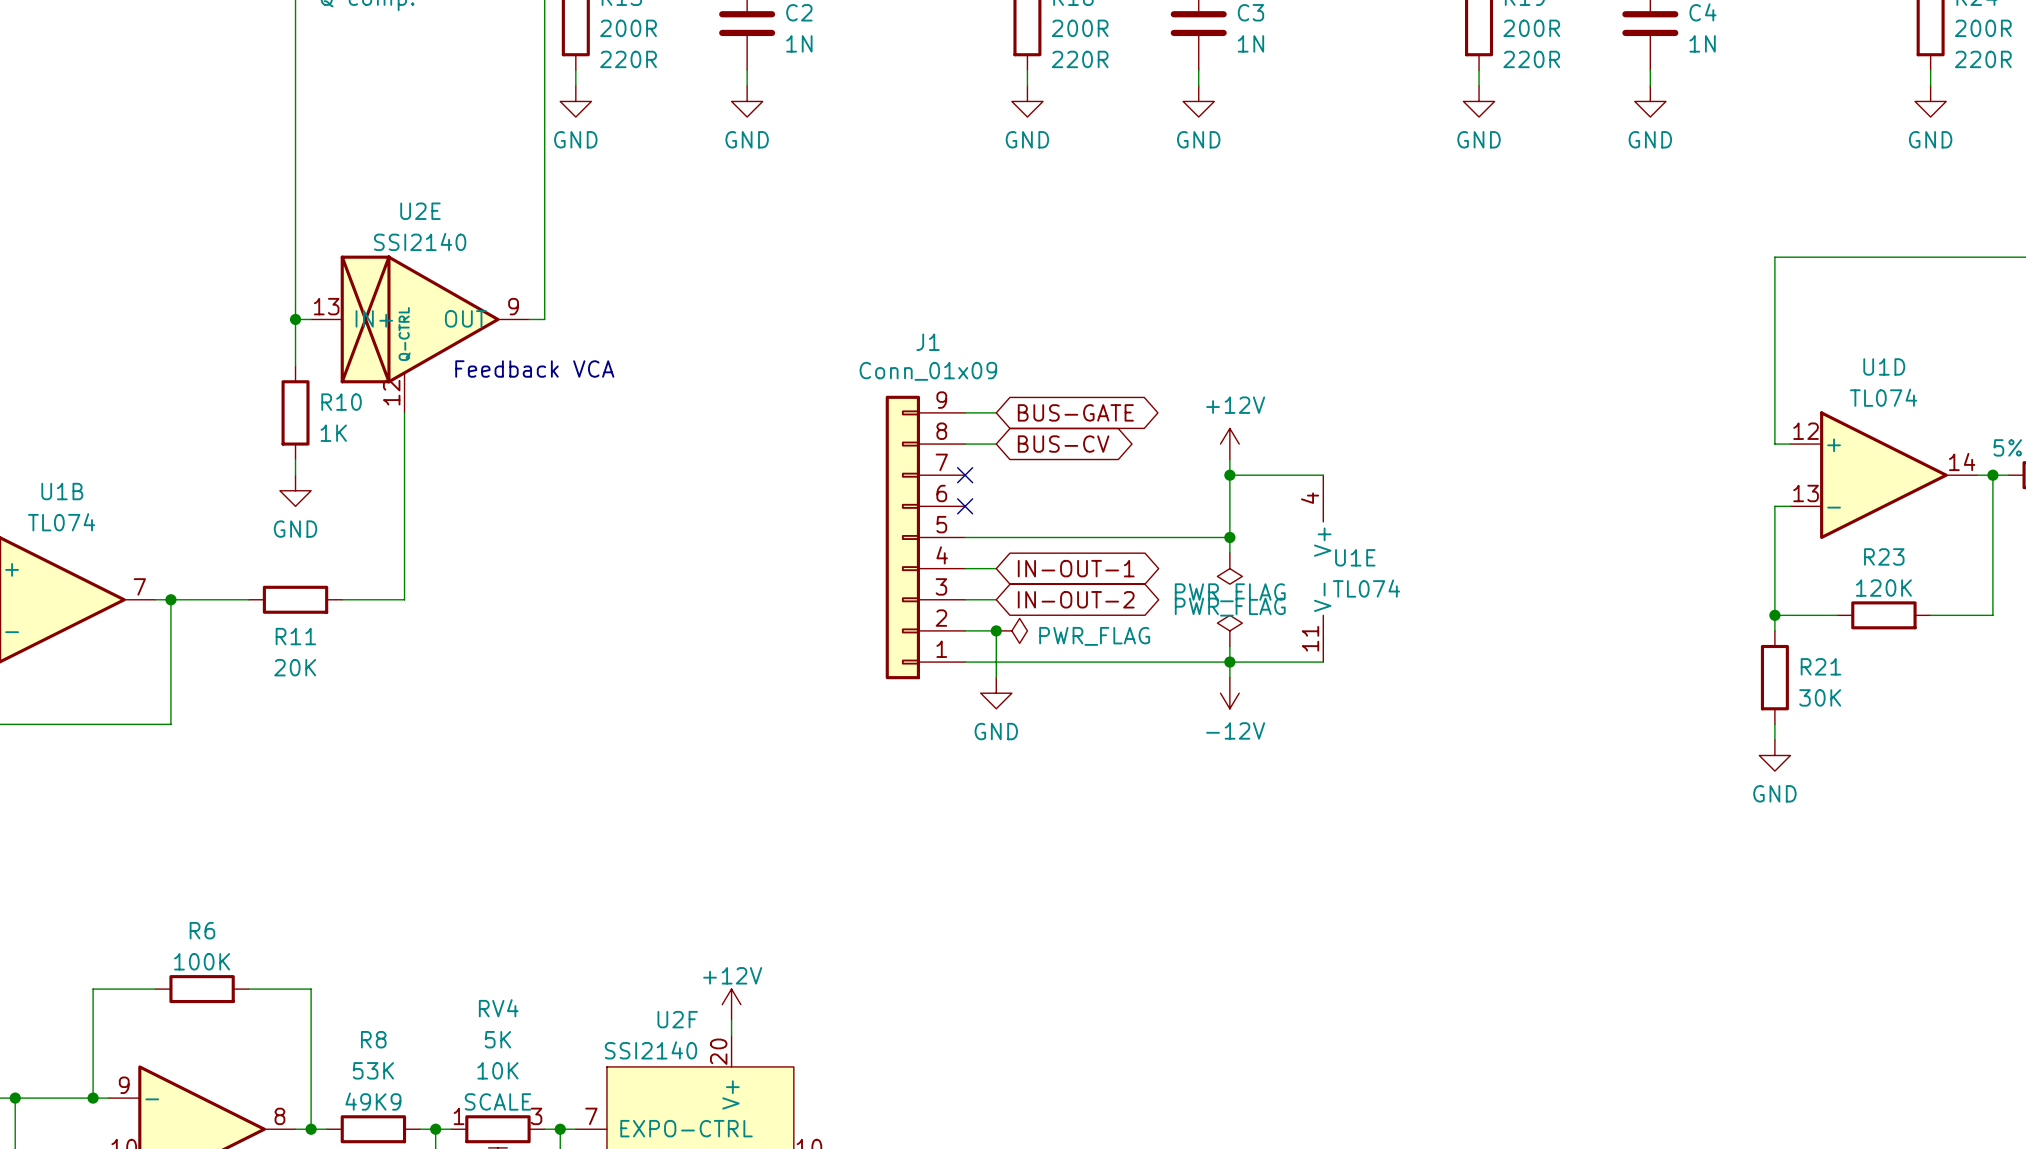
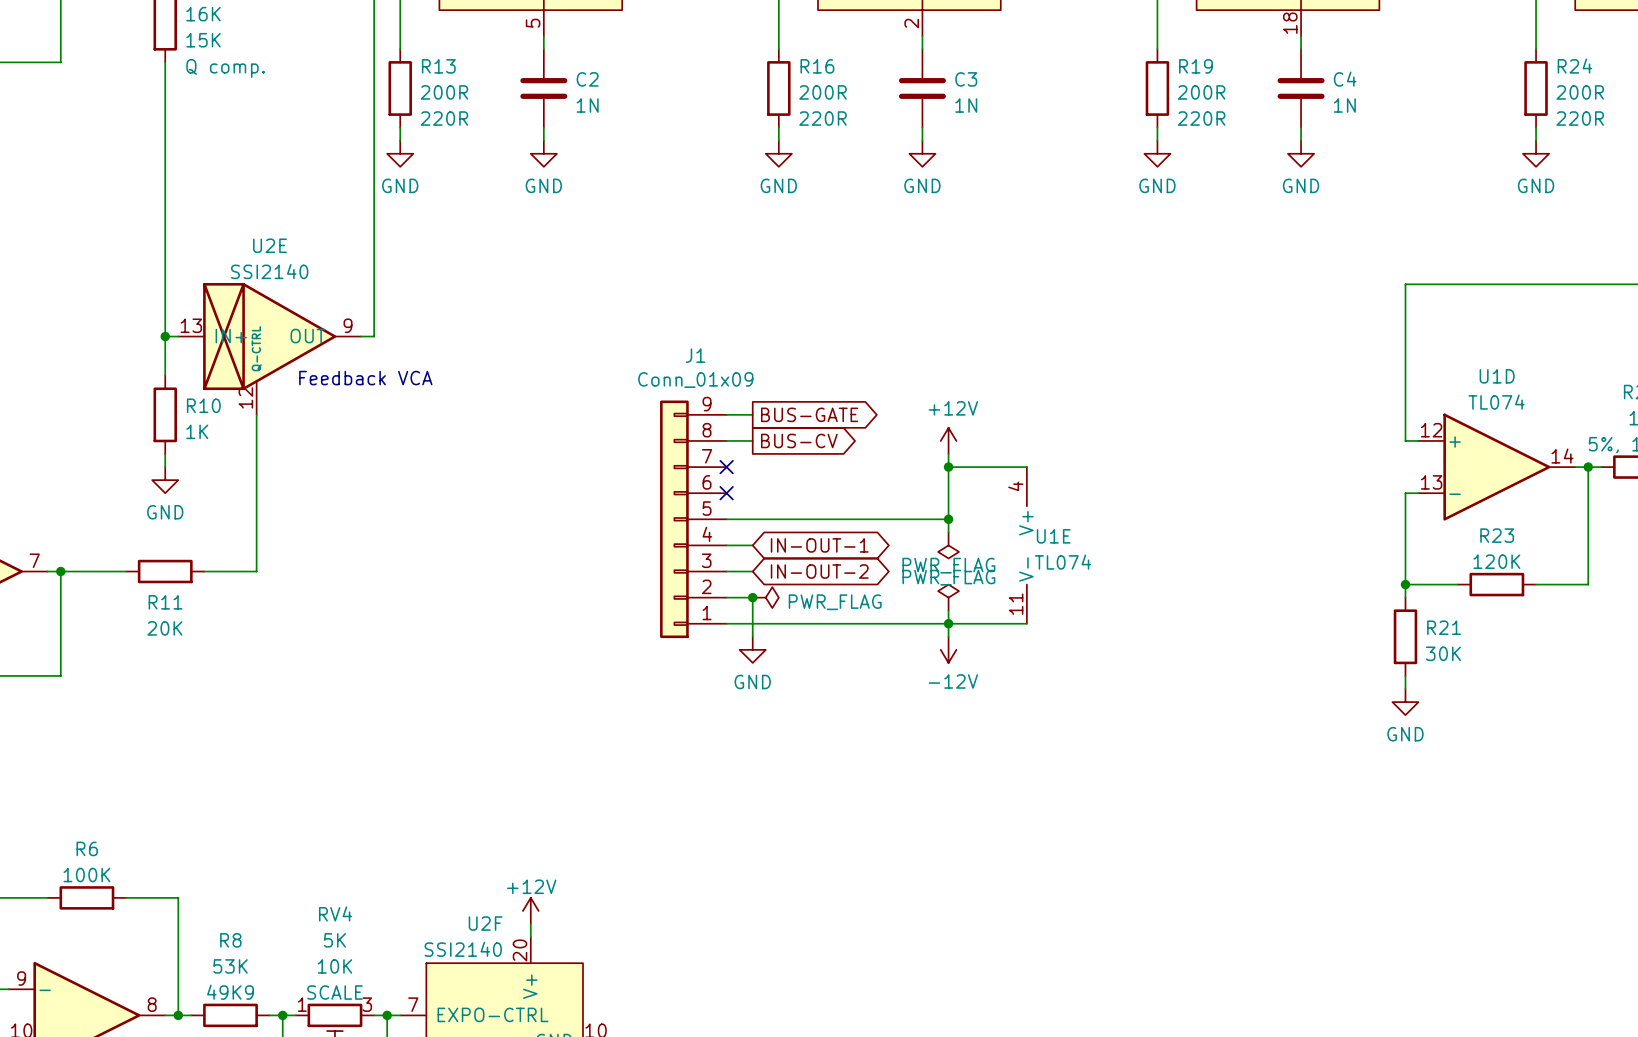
global label shape: bidirectional (1075, 412) -> output (809, 414)
global label shape: bidirectional (1063, 444) -> output (799, 440)

